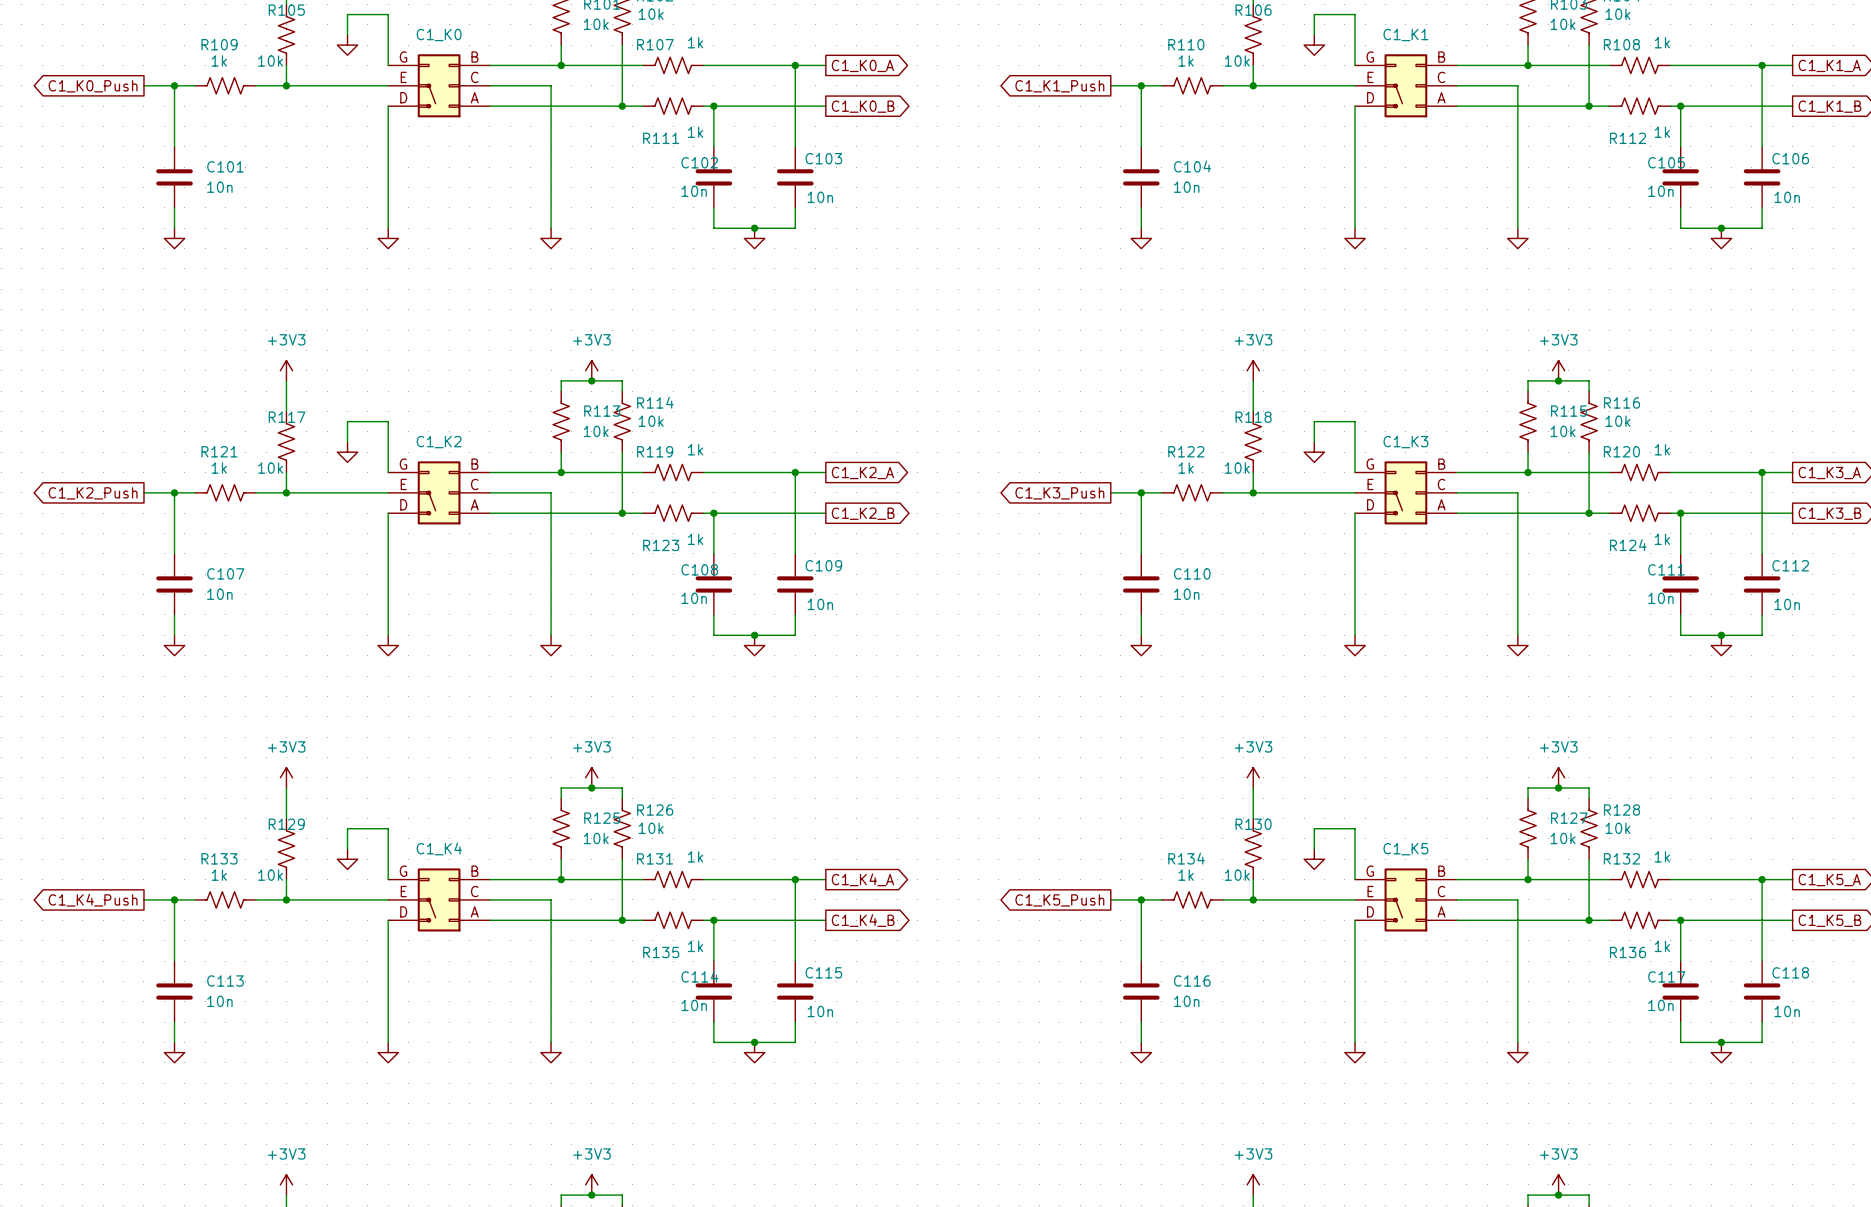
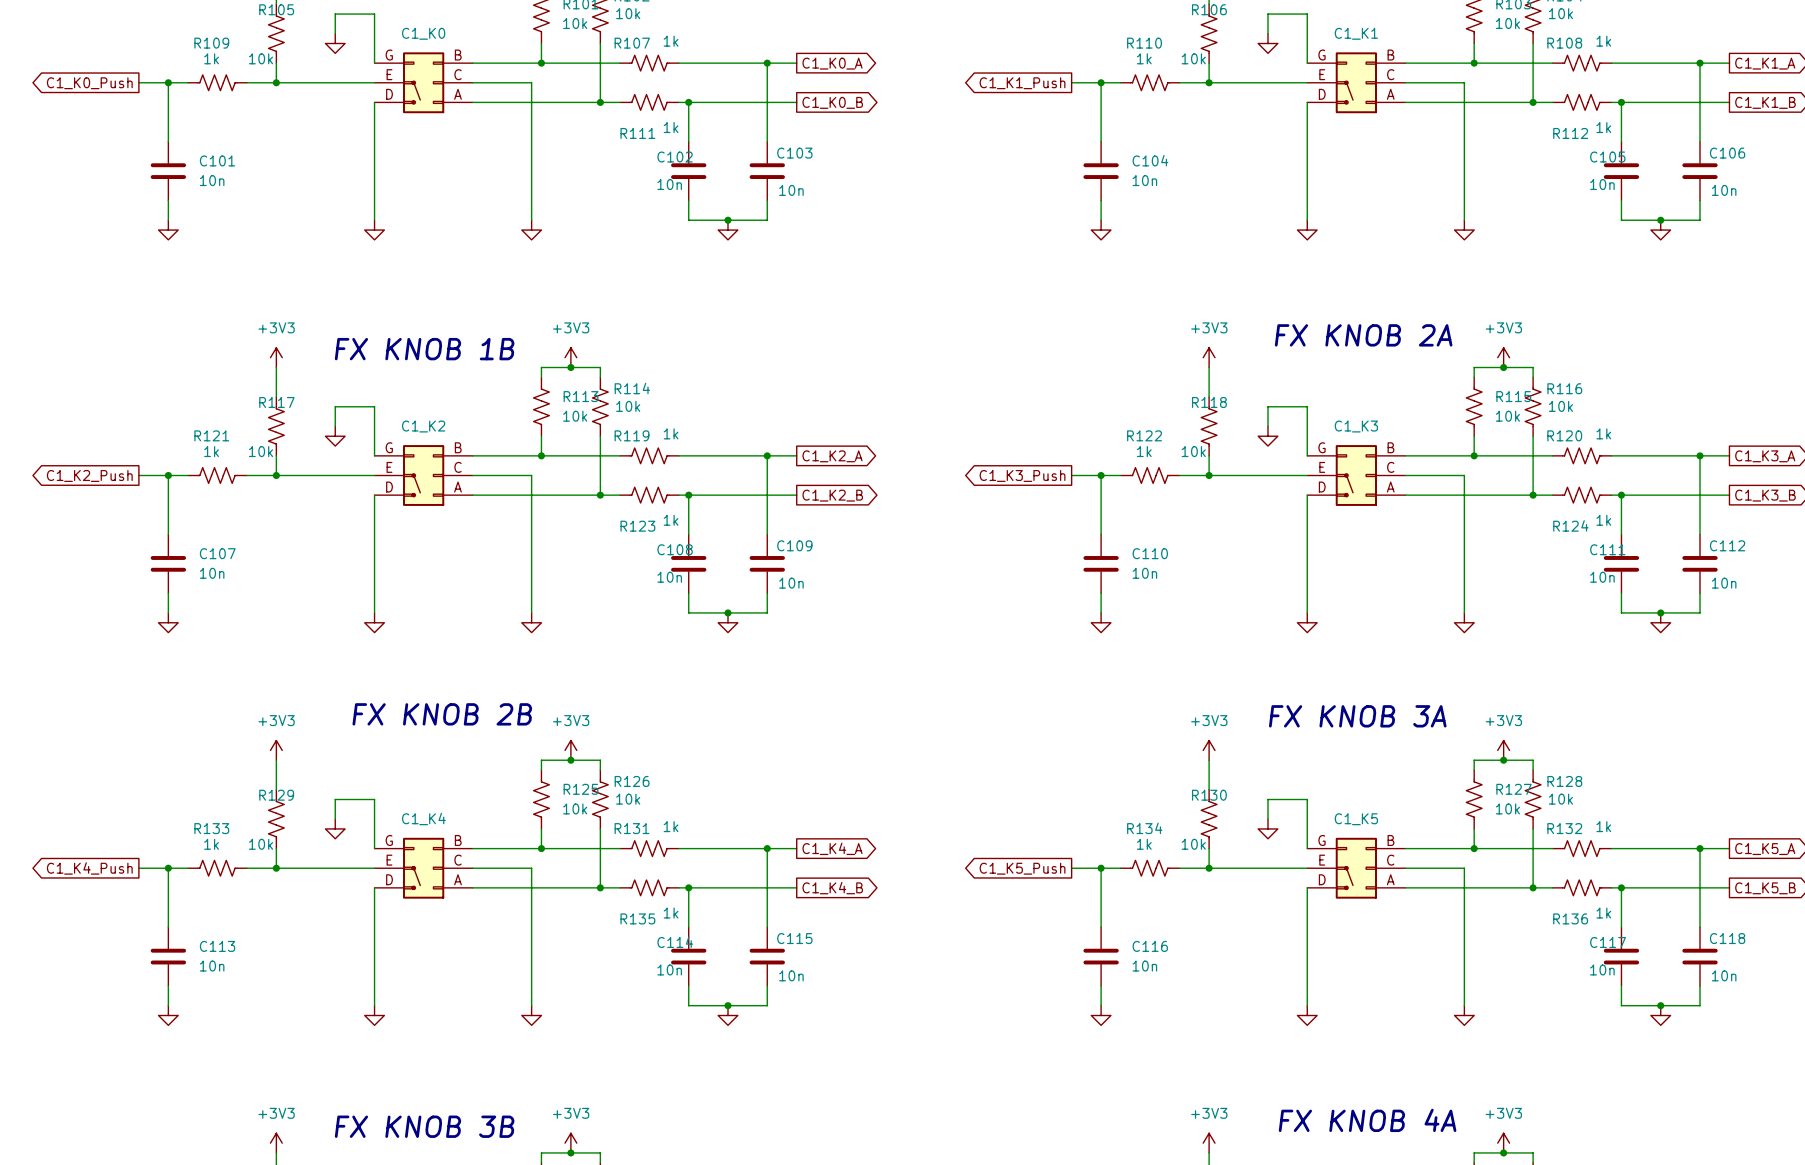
text: none -> FX KNOB 2A (1363, 335)
text: none -> FX KNOB 1B (424, 349)
text: none -> FX KNOB 2B (442, 714)
text: none -> FX KNOB 3A (1357, 716)
text: none -> FX KNOB 4A (1367, 1120)
text: none -> FX KNOB 3B (424, 1126)

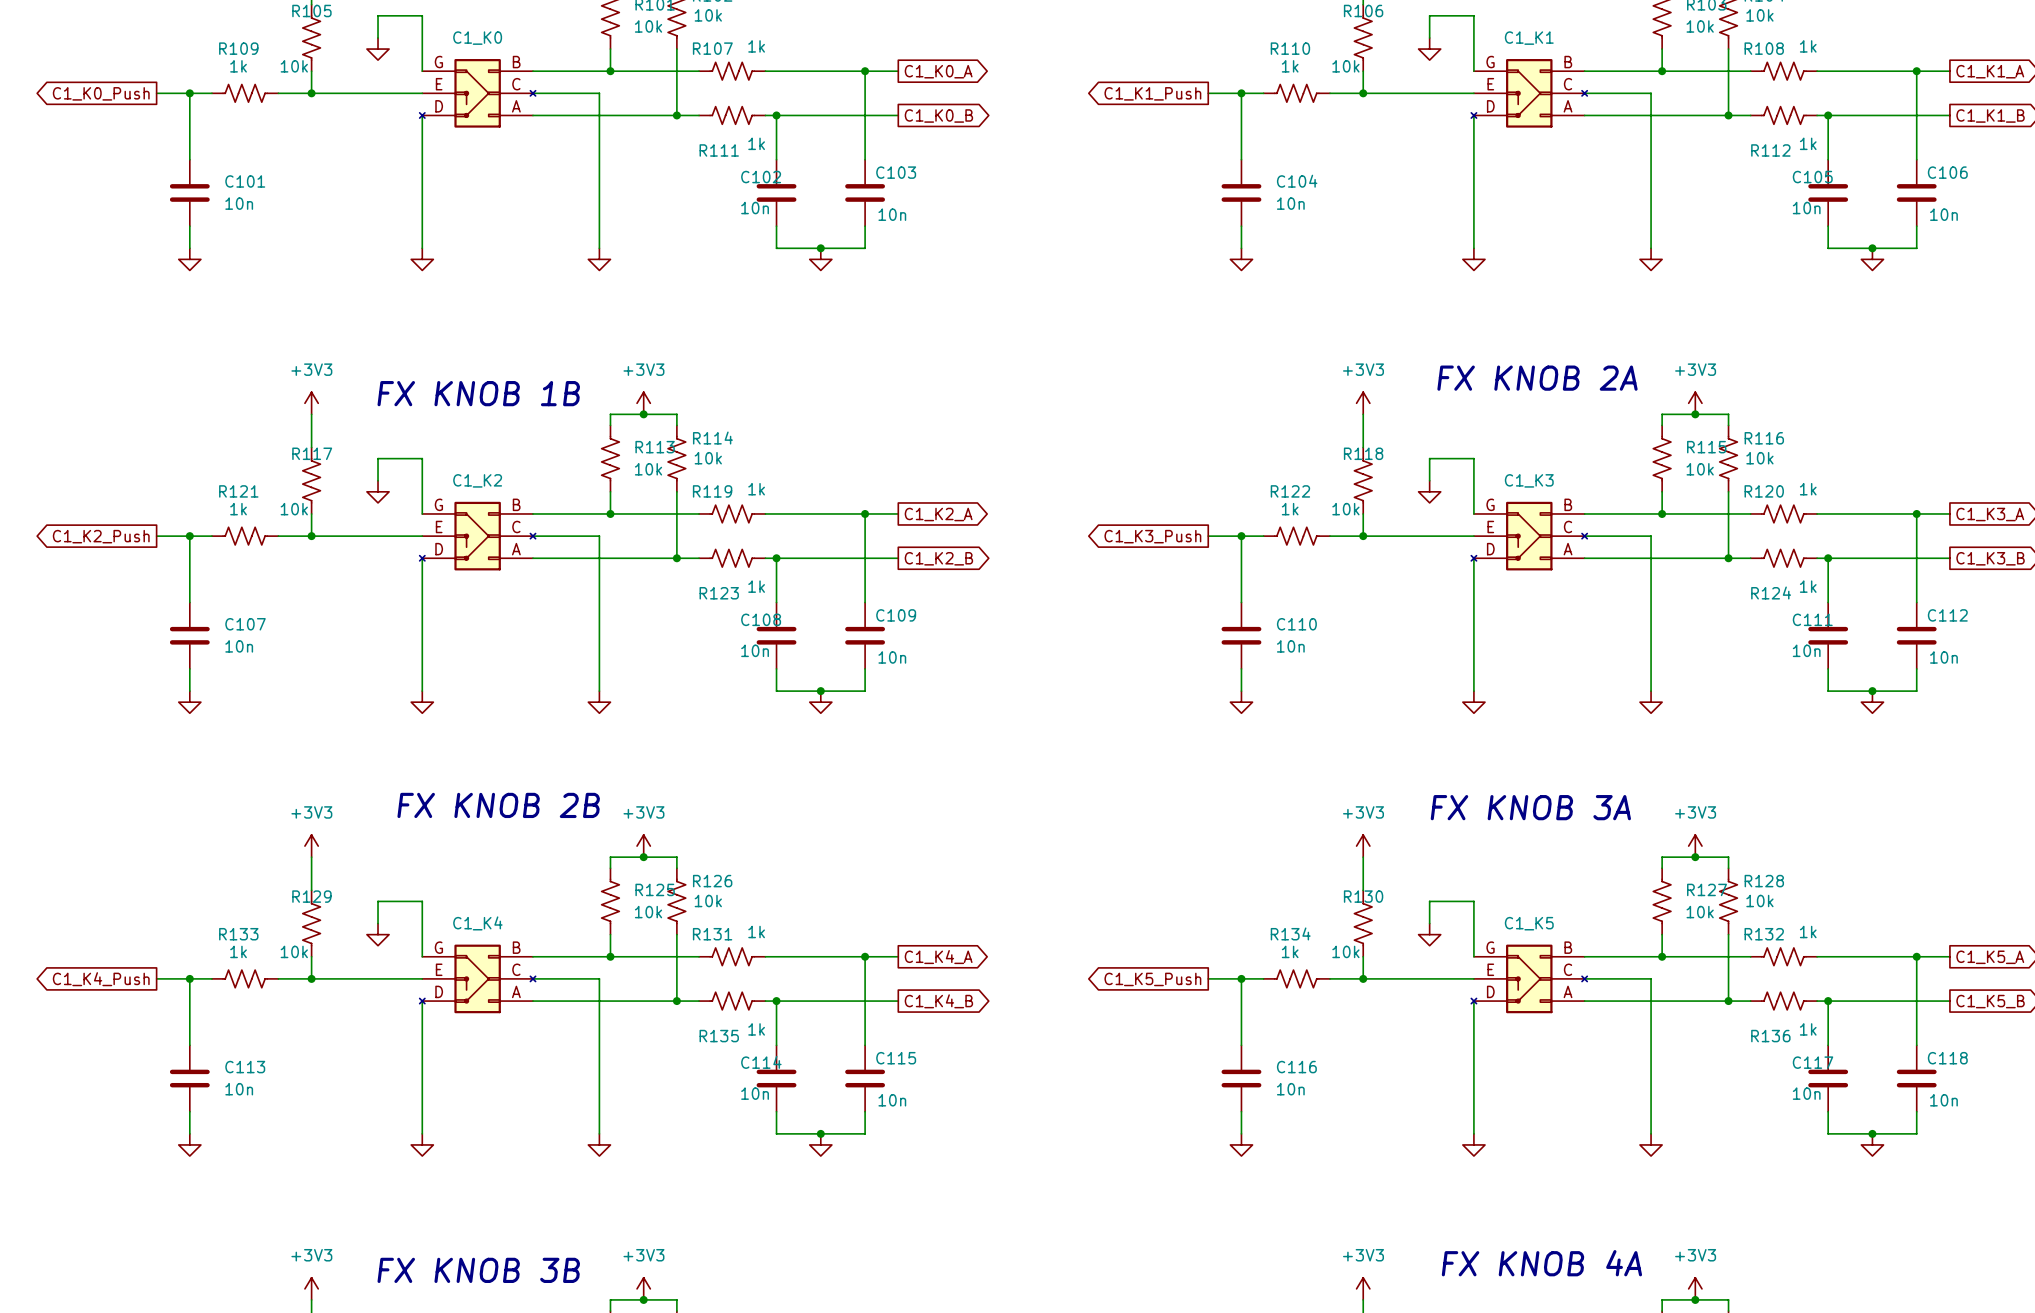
part symbol: [374, 52, 473, 114] -> [419, 59, 536, 128]
part symbol: [1307, 52, 1406, 114] -> [1471, 59, 1588, 128]
part symbol: [374, 445, 473, 506] -> [419, 501, 536, 571]
part symbol: [1307, 445, 1406, 506] -> [1471, 501, 1588, 571]
part symbol: [374, 837, 473, 899] -> [419, 944, 536, 1014]
part symbol: [1307, 837, 1406, 899] -> [1471, 944, 1588, 1014]

